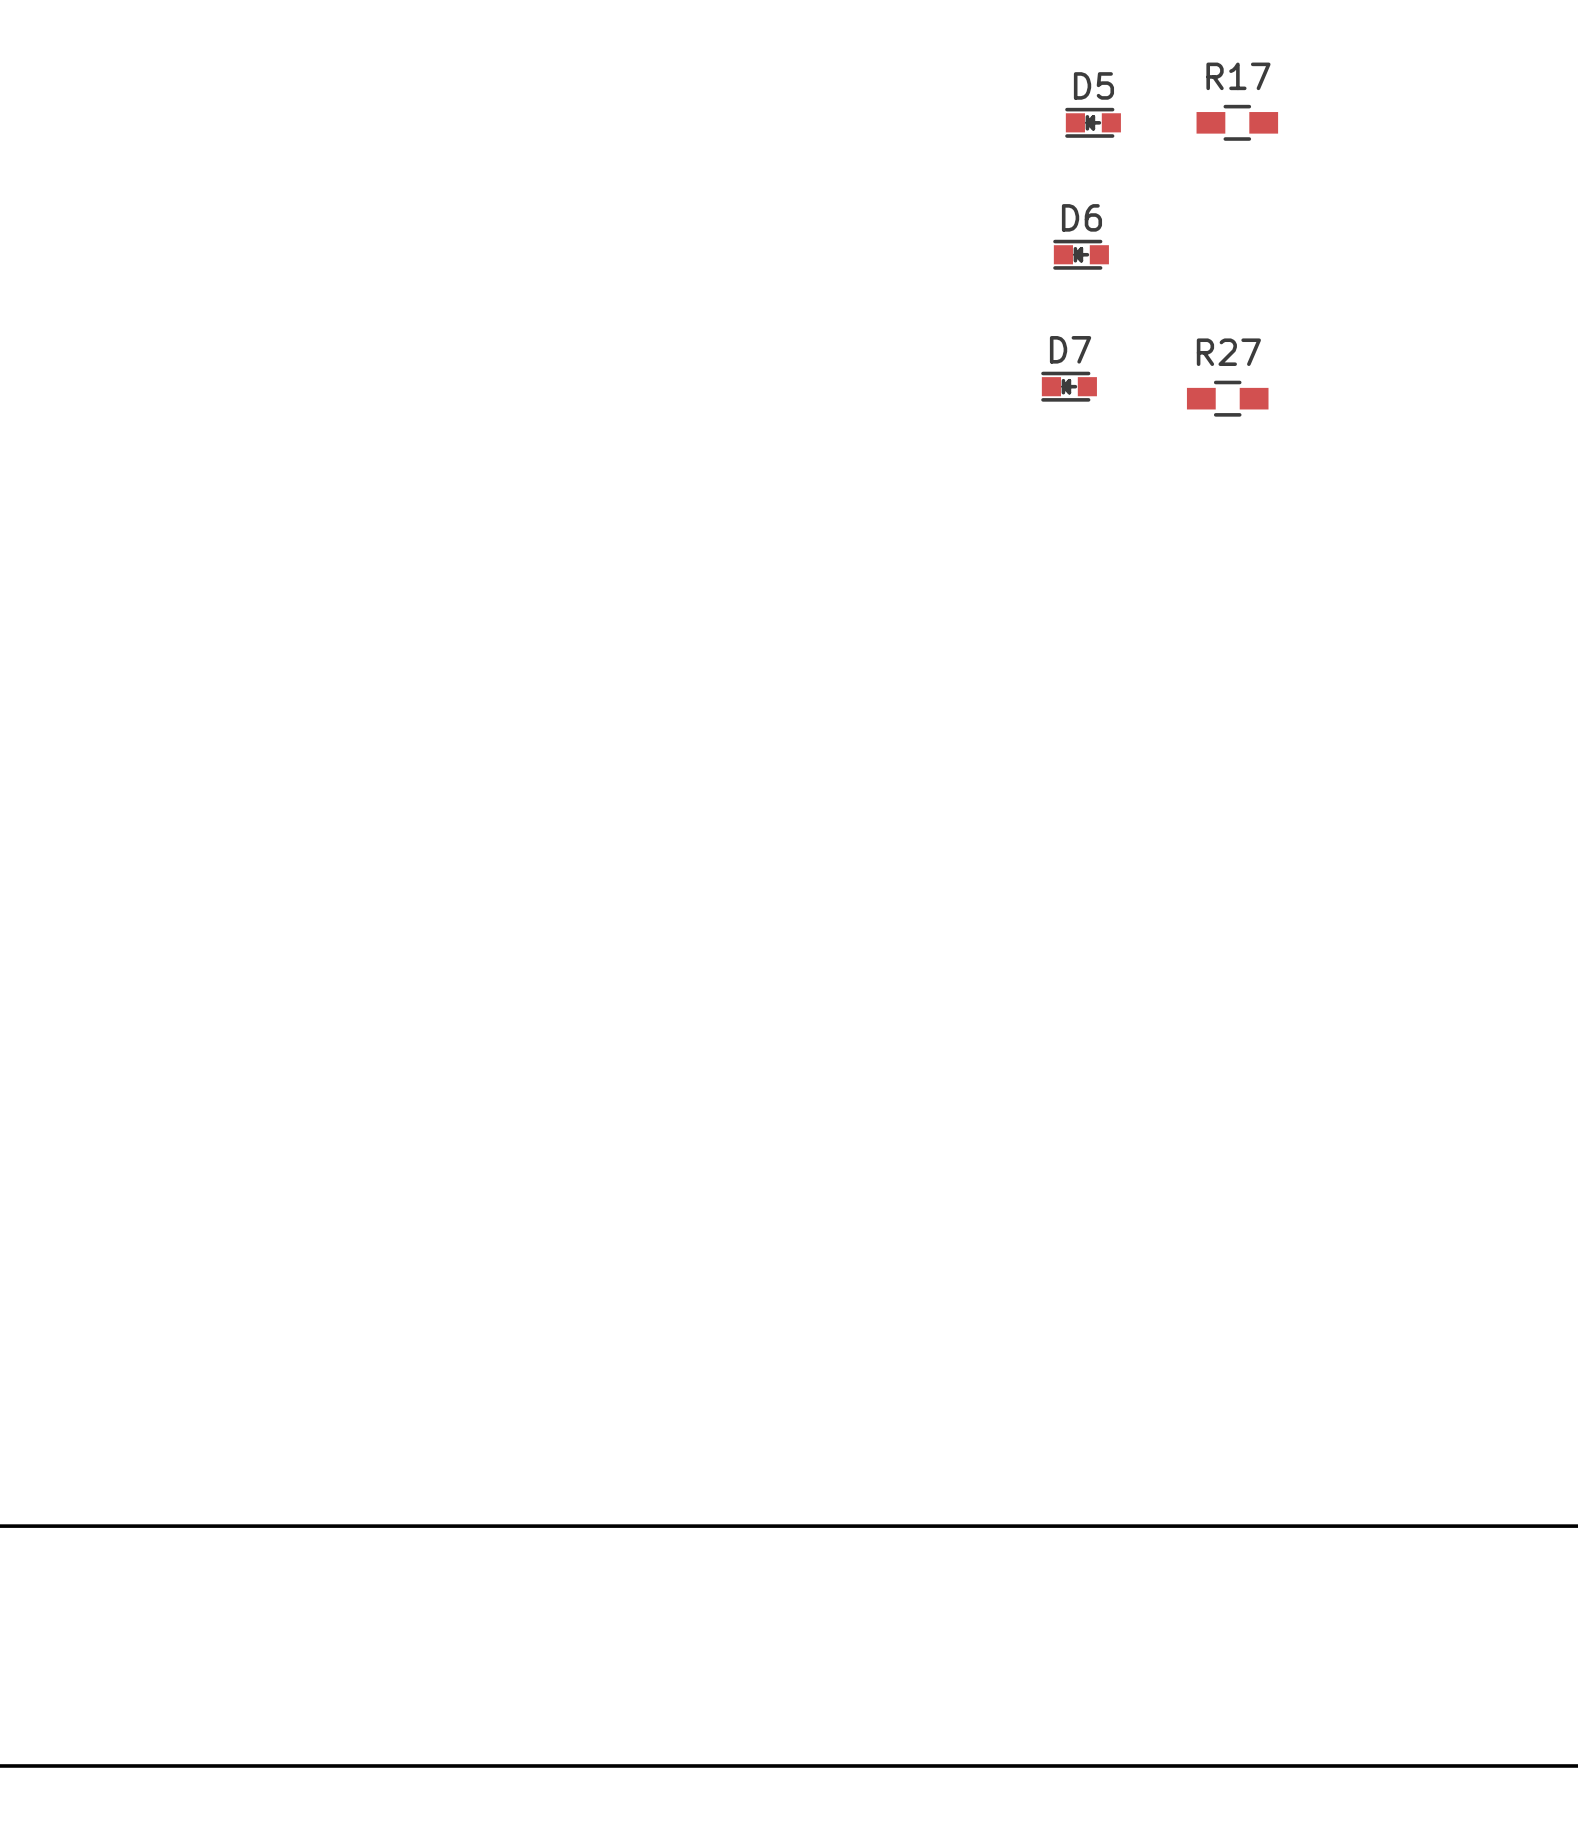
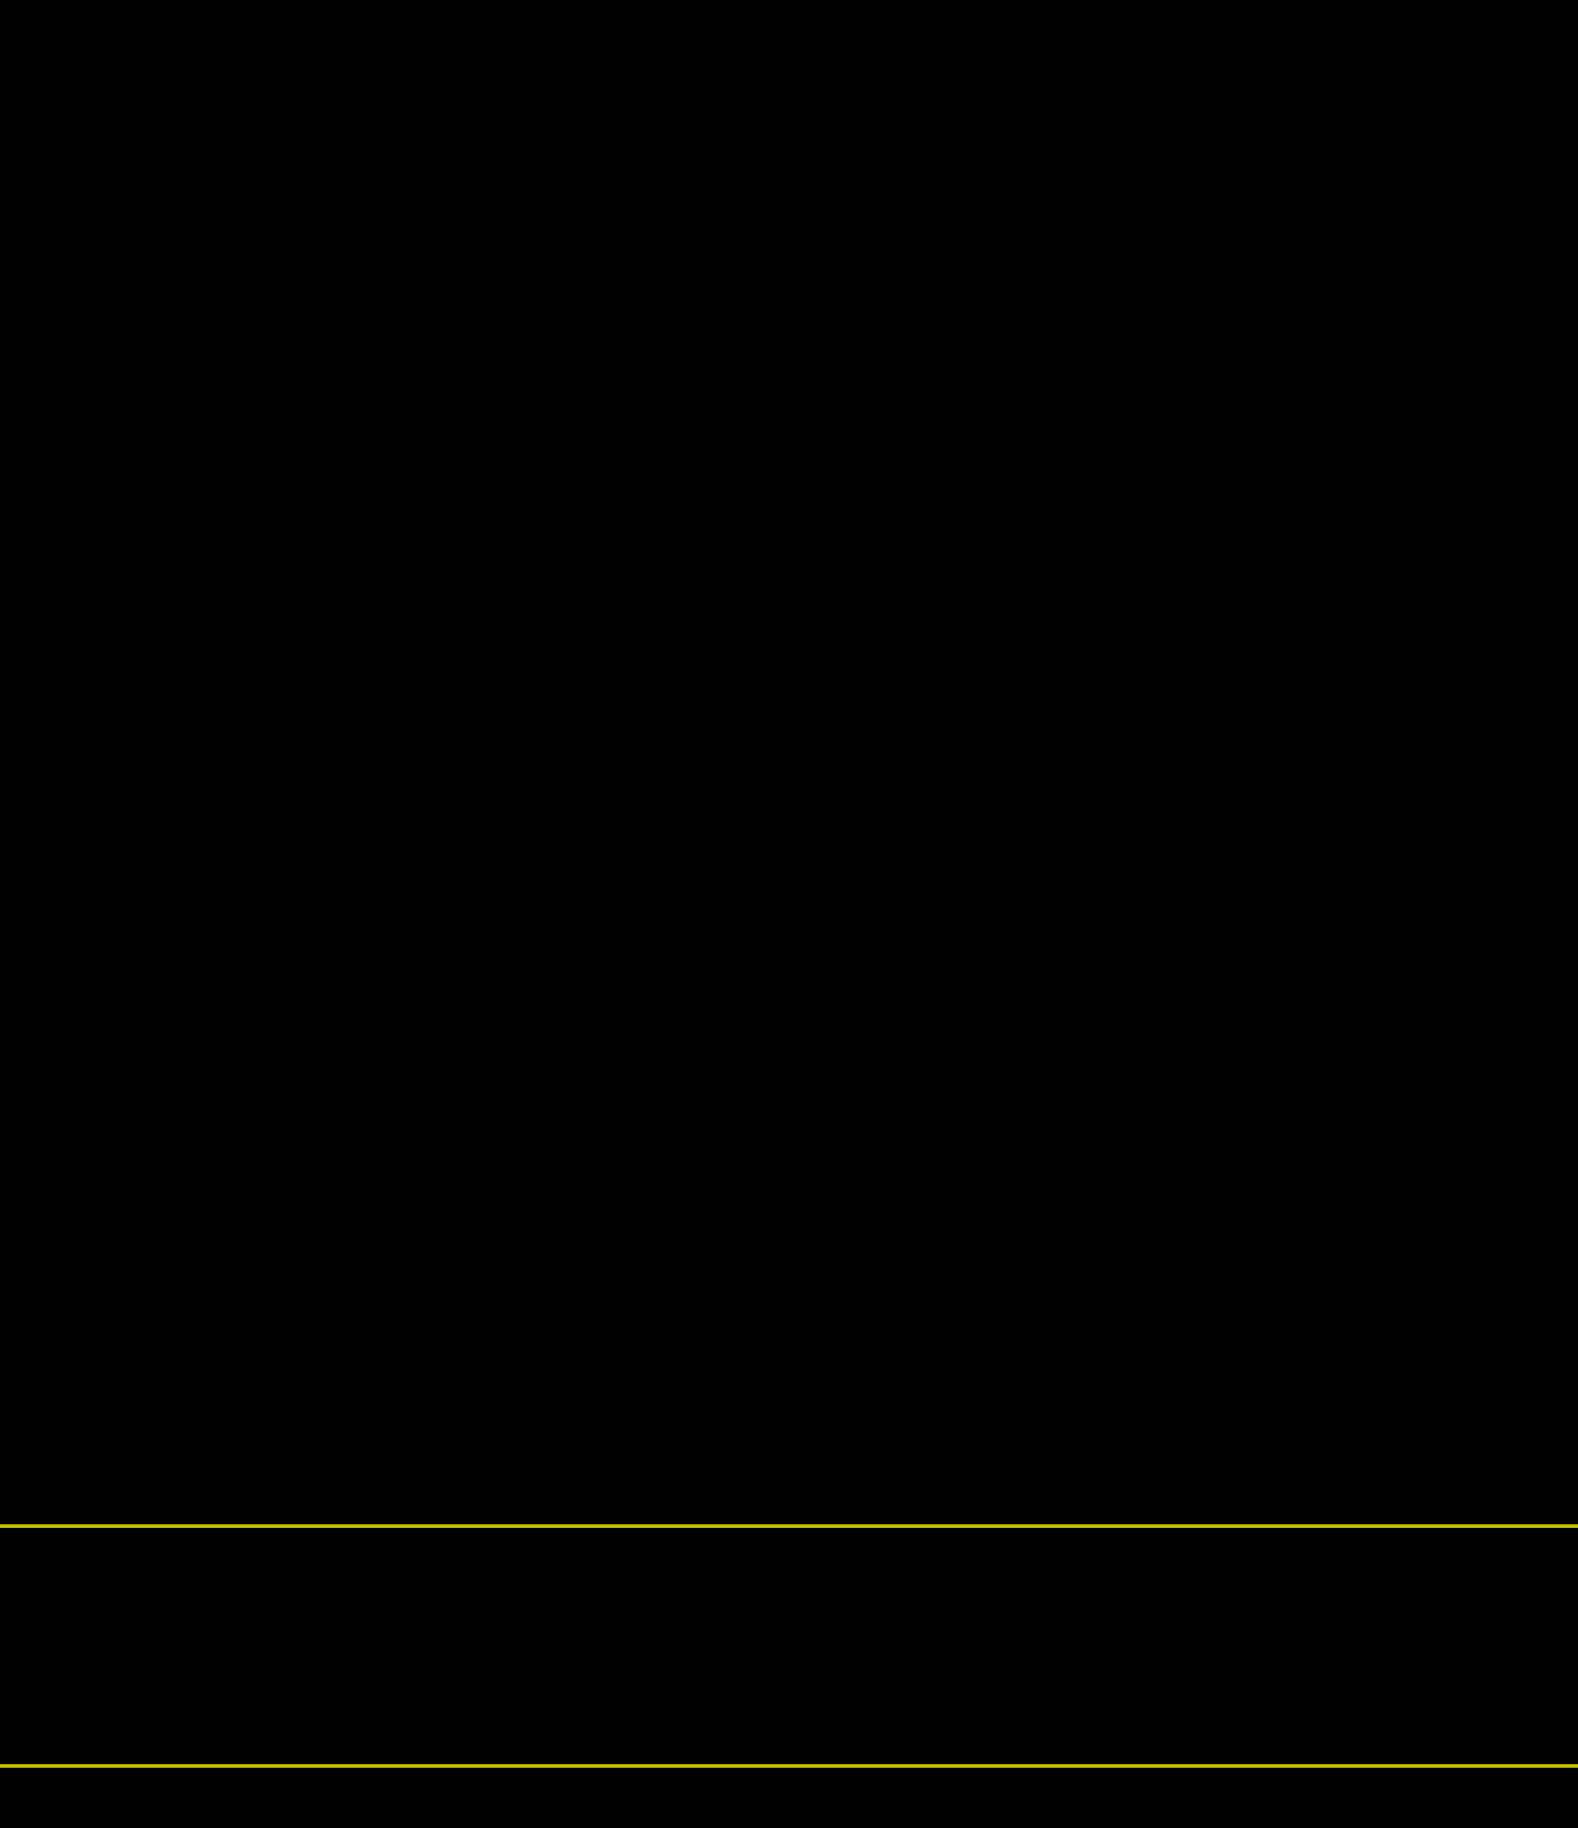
D5: (1093, 122) -> none
R17: (1237, 122) -> none
D6: (1081, 254) -> none
D7: (1069, 386) -> none
R27: (1227, 398) -> none

